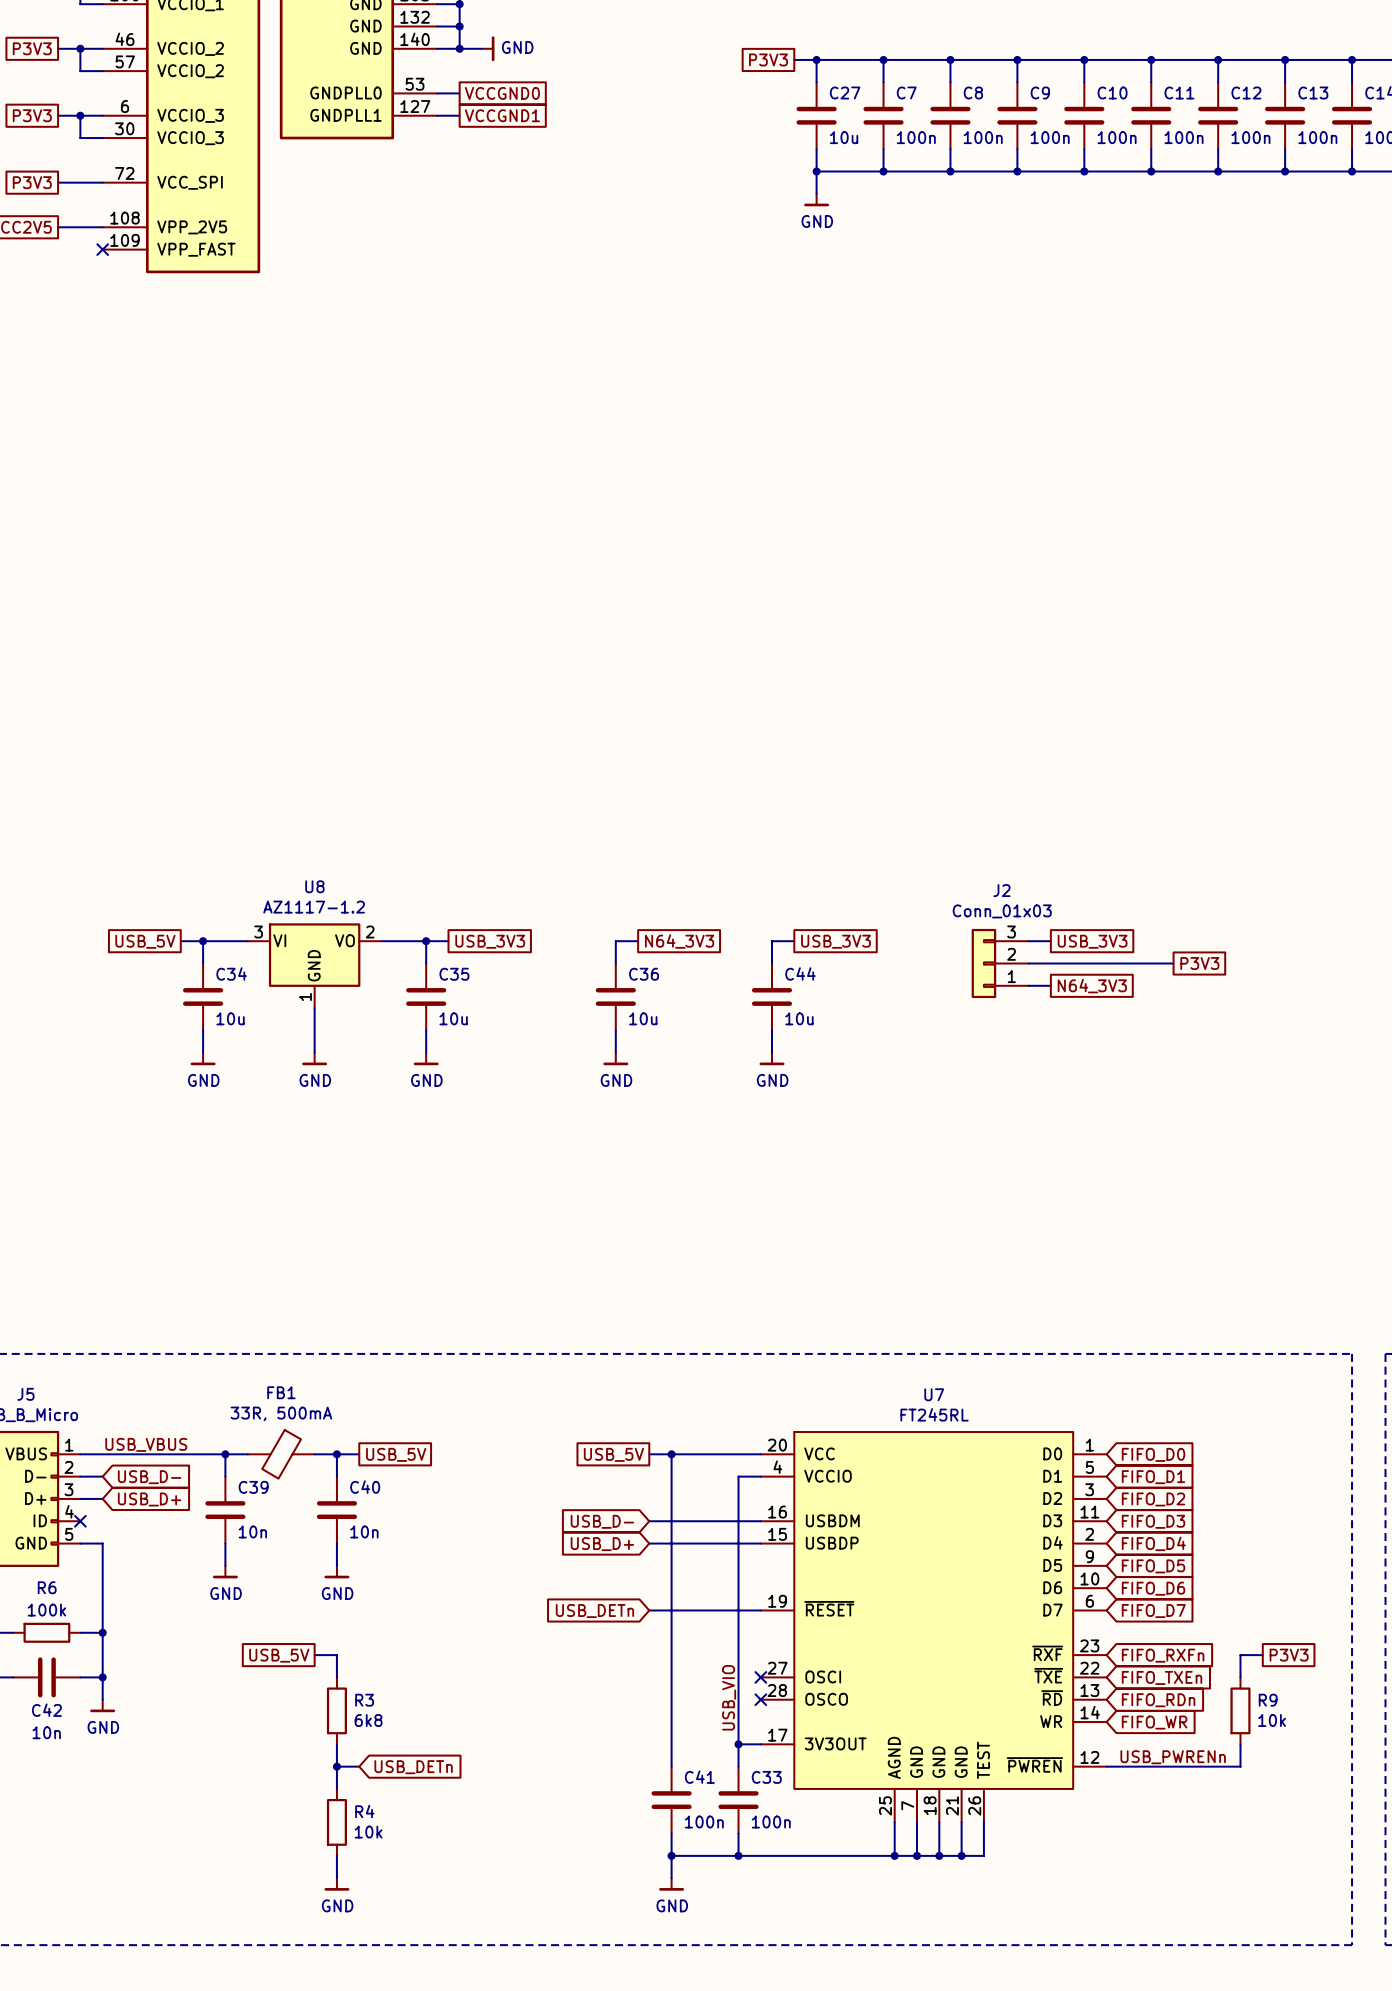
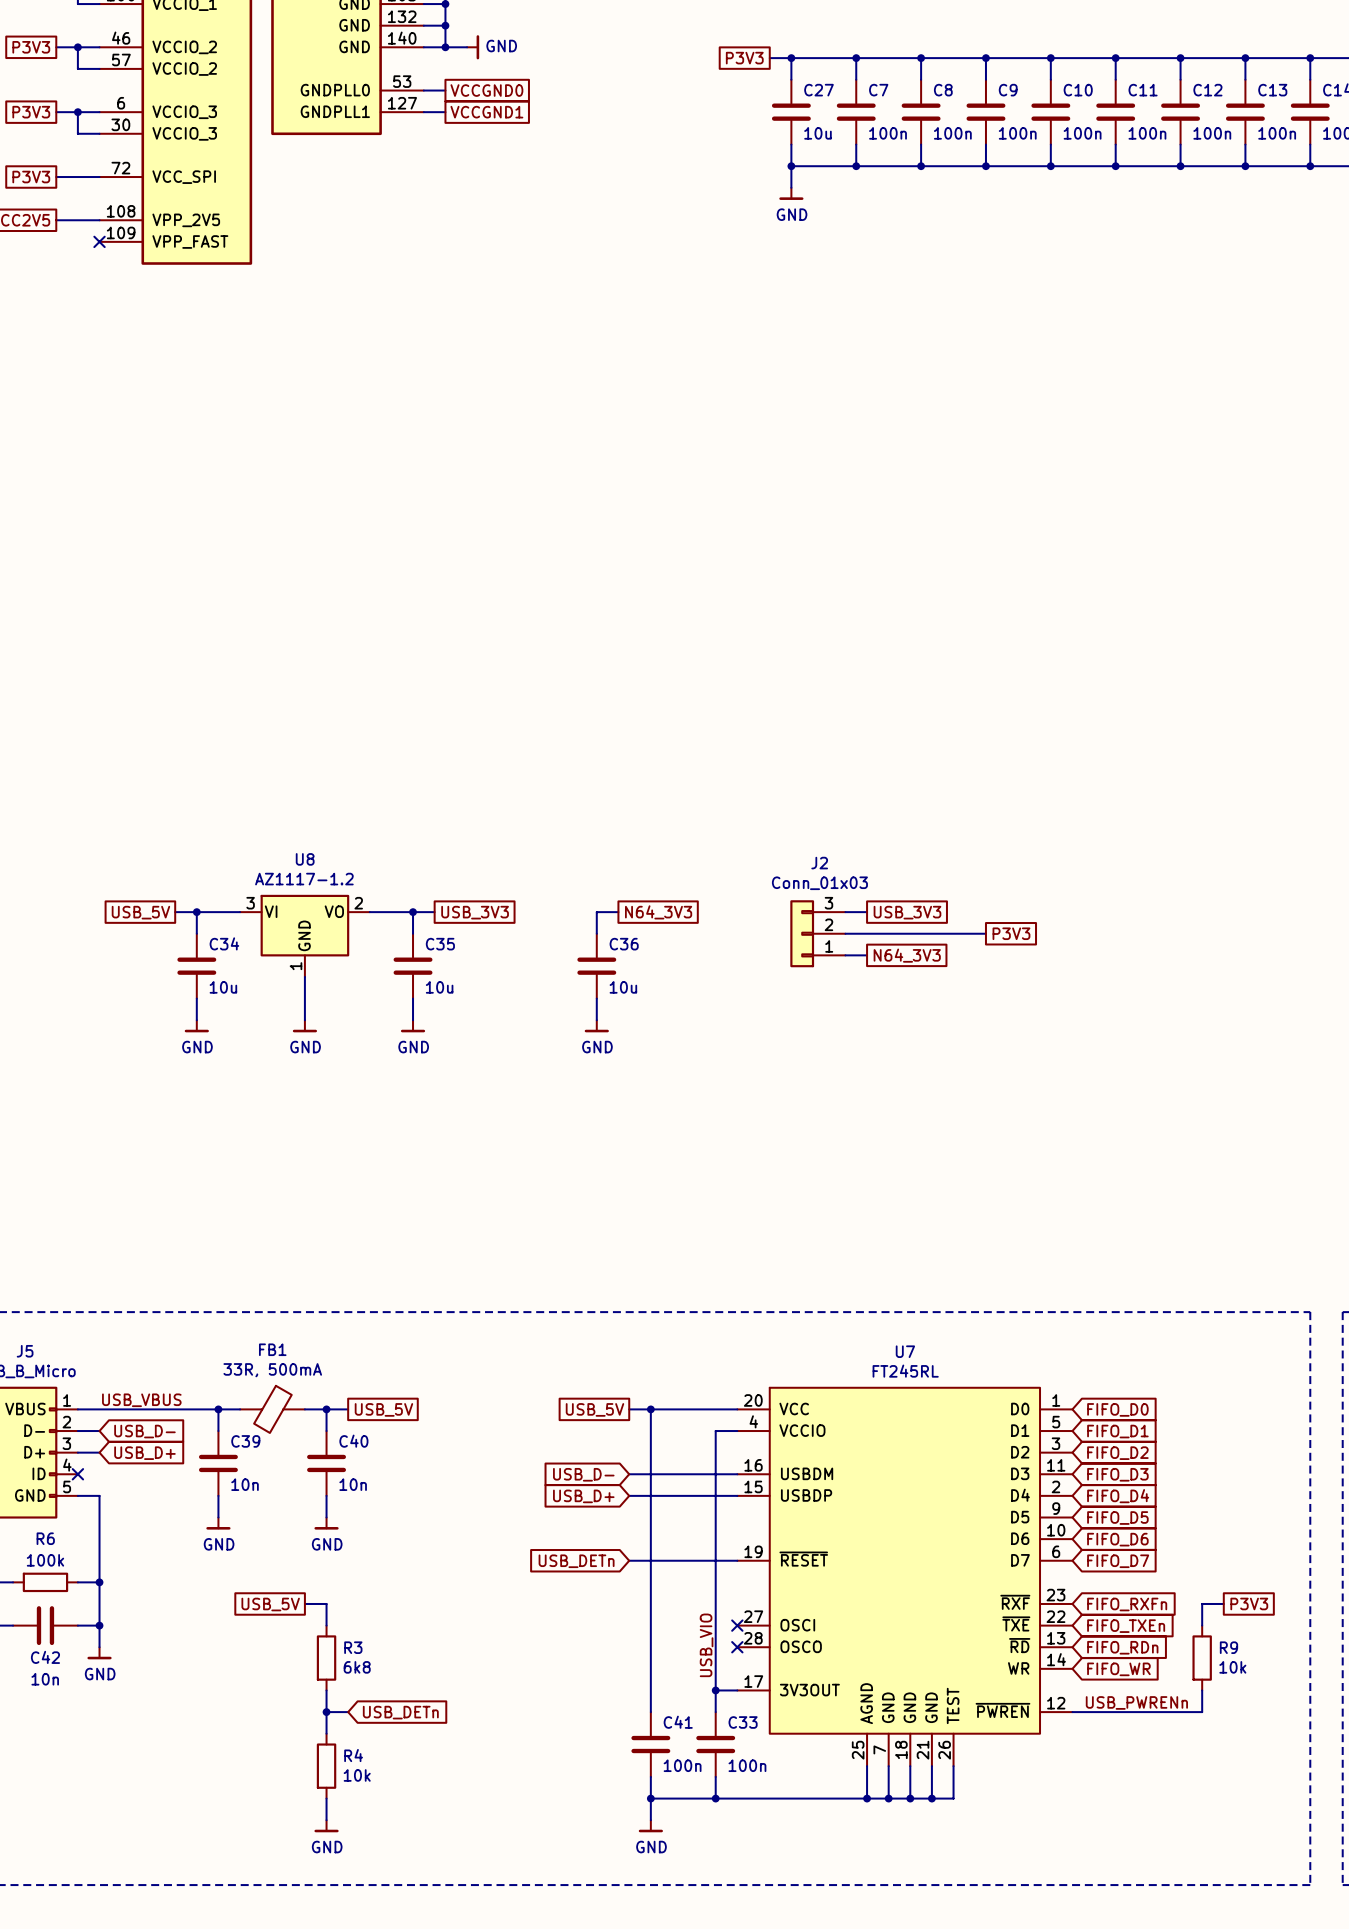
wire: (794, 941) (771, 941) (771, 963) -> none
global label position: USB_3V3 (836, 941) -> USB_3V3 (907, 912)
wire: (1028, 941) (1050, 941) -> (845, 912) (867, 912)
global label: USB_3V3 (1092, 941) -> none
J2 position: (1000, 963) -> (817, 933)
wire: (1028, 963) (1173, 963) -> (845, 933) (985, 933)
global label position: P3V3 (1199, 963) -> P3V3 (1011, 933)
wire: (1028, 985) (1050, 985) -> (845, 955) (867, 955)
global label position: N64_3V3 (1092, 986) -> N64_3V3 (907, 955)
C44: 10u (771, 996) -> none
wire: (771, 1030) (771, 1052) -> none
power symbol: GND (771, 1058) -> none

